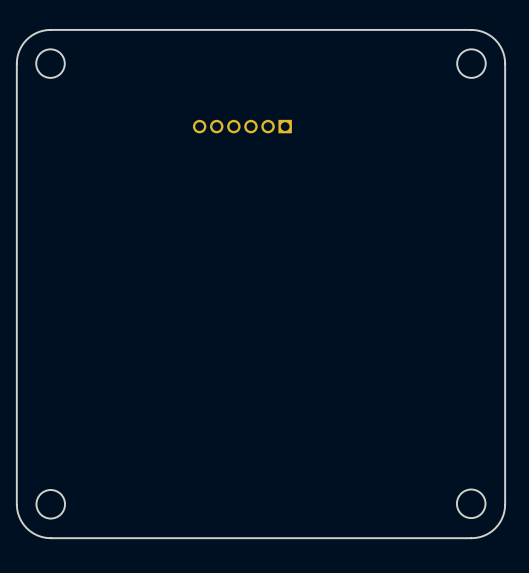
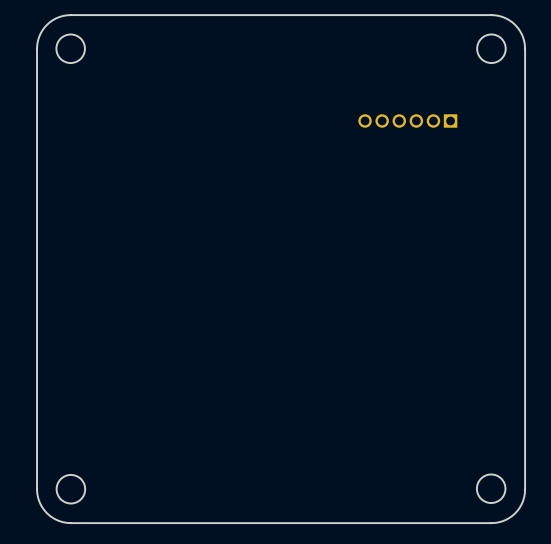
part position: (242, 126) -> (407, 120)

